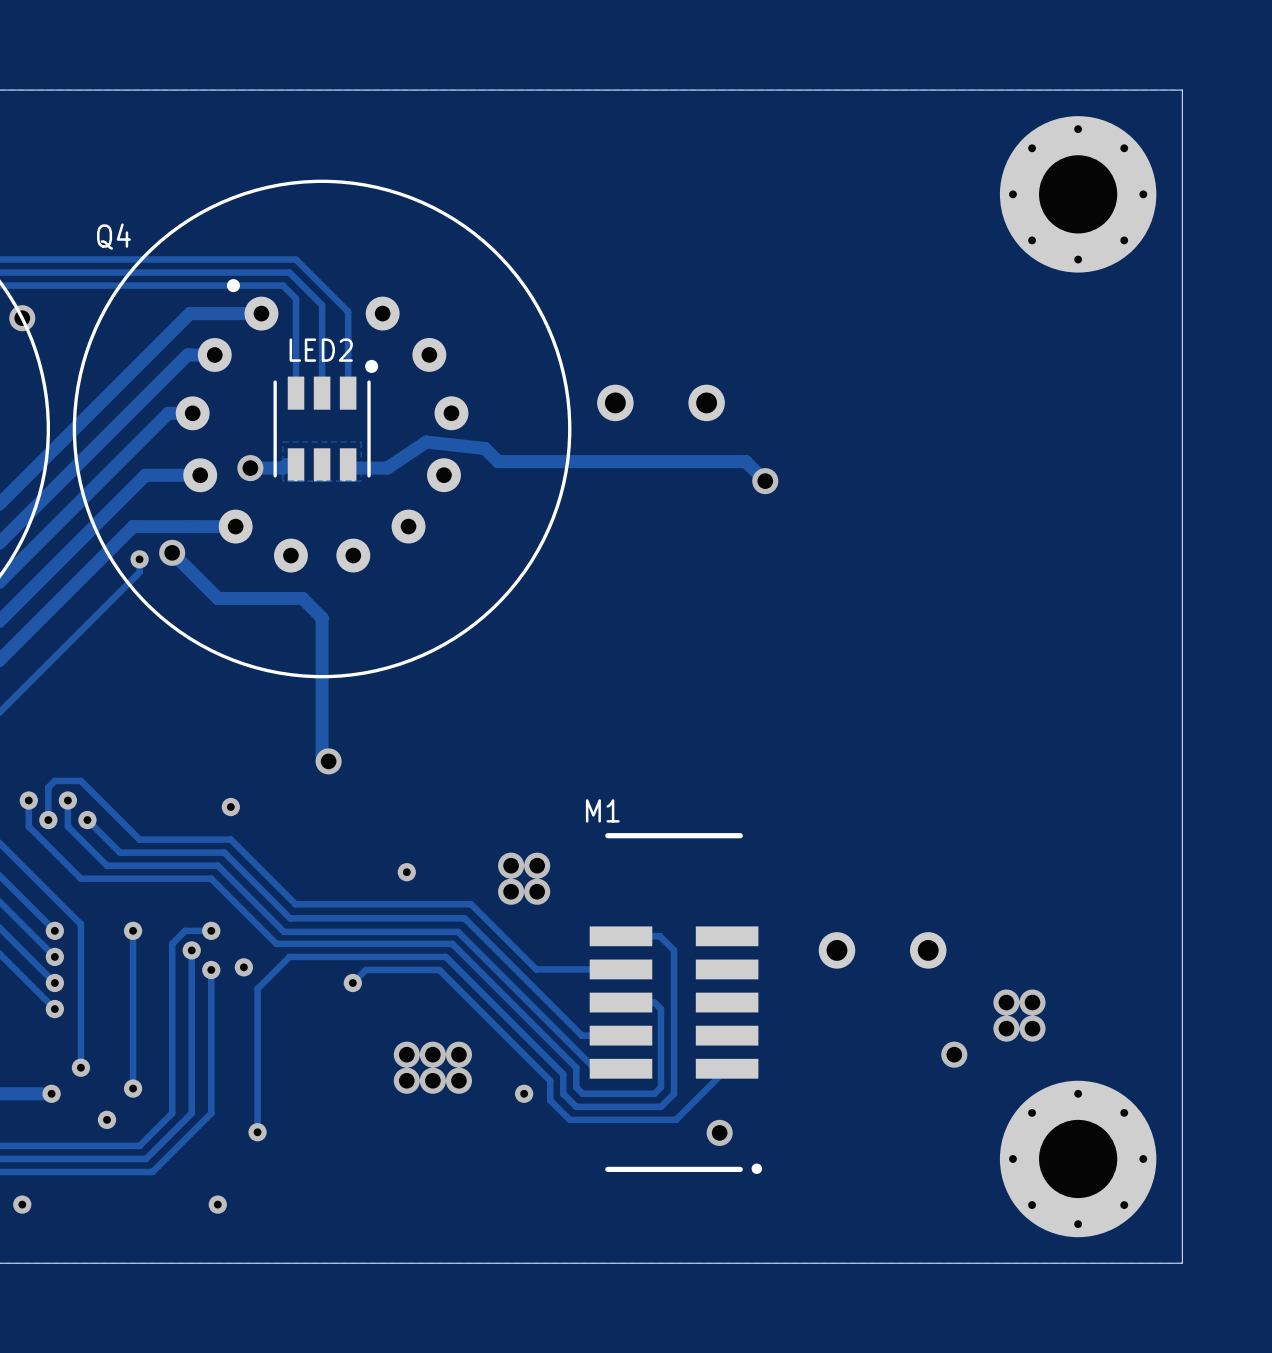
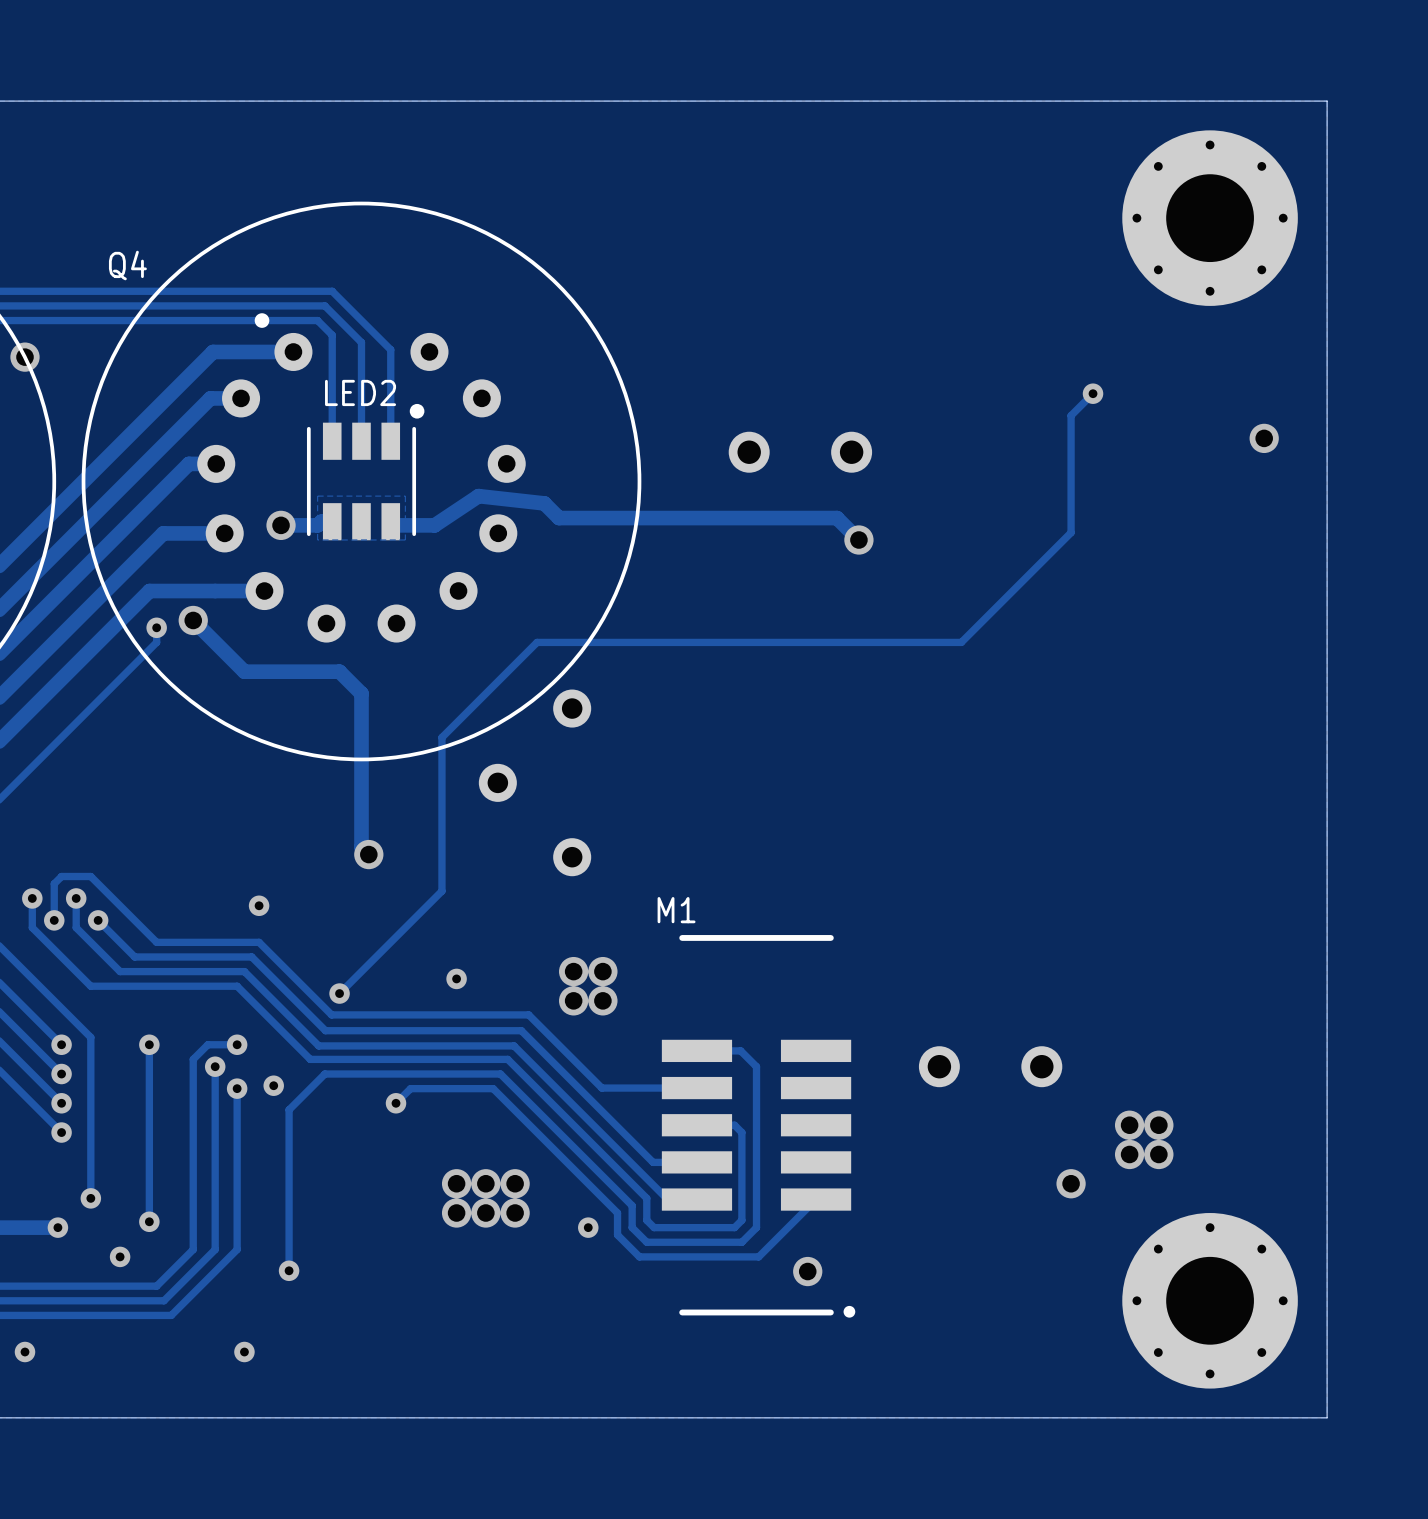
track: none -> (1093, 393) (1071, 415) (1071, 532) (961, 642) (537, 642) (441, 737) (441, 891) (339, 993)
via: none -> (1093, 393)
via: none -> (1264, 438)
part position: (661, 402) -> (800, 452)
part: none -> (535, 782)
via: none -> (339, 993)

